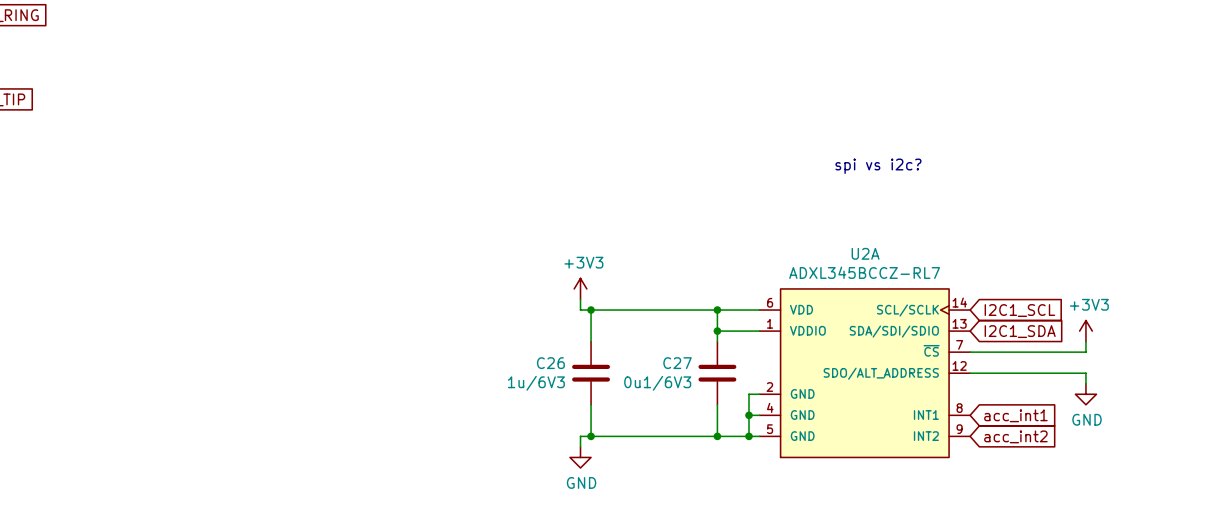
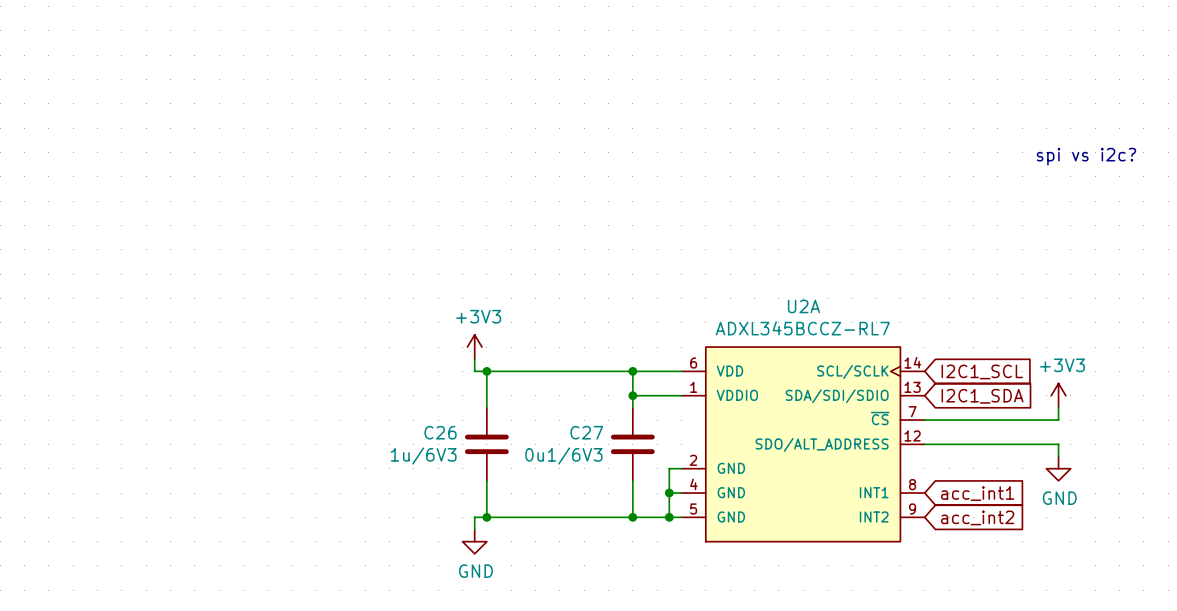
text: none -> spi vs i2c? (1086, 156)
text: spi vs i2c? (878, 166) -> none

